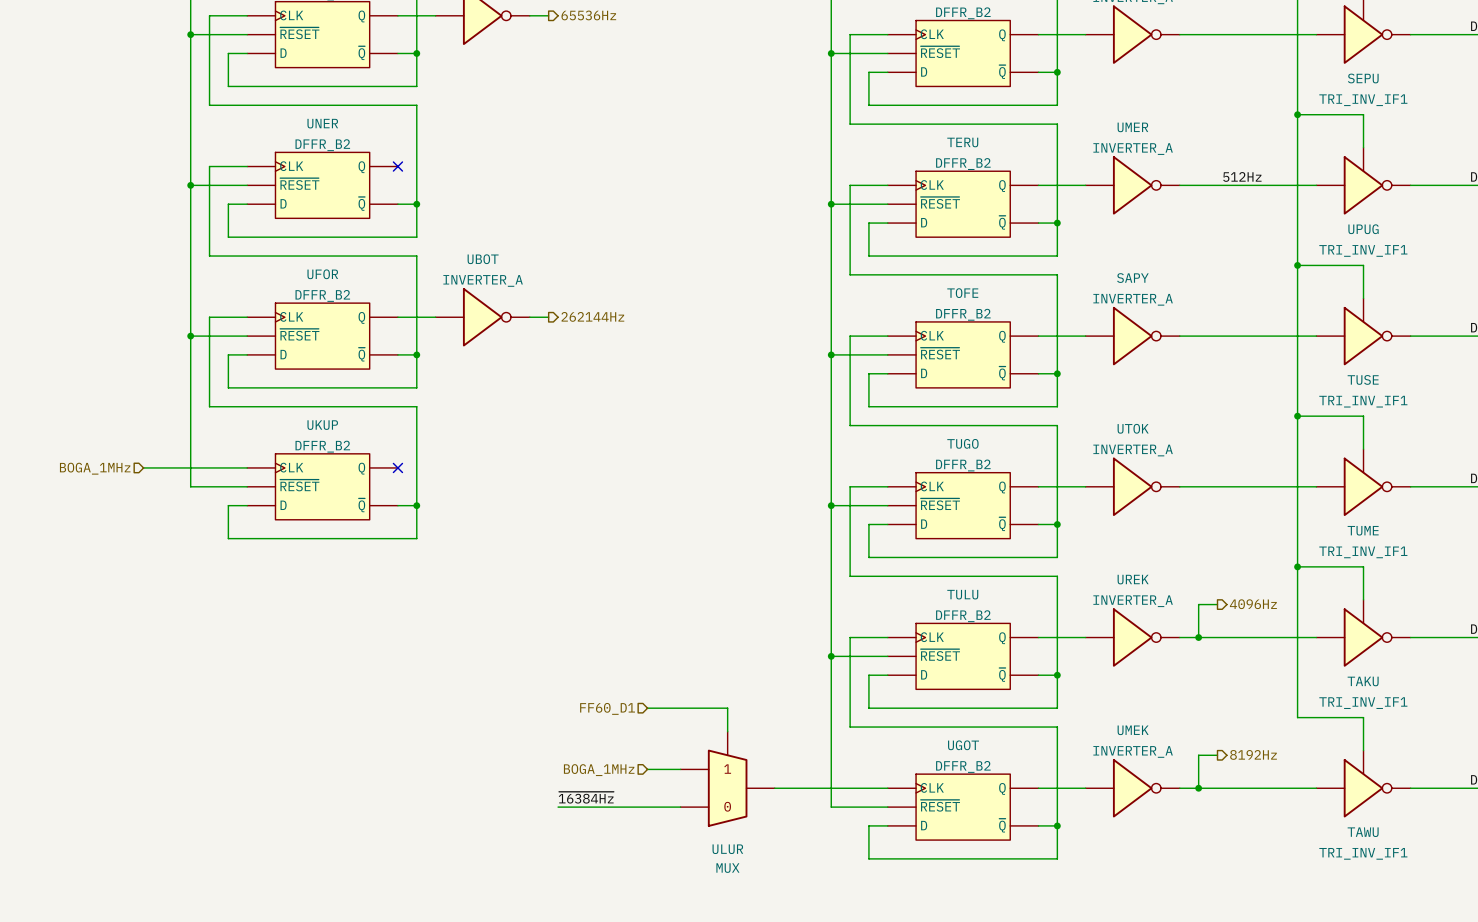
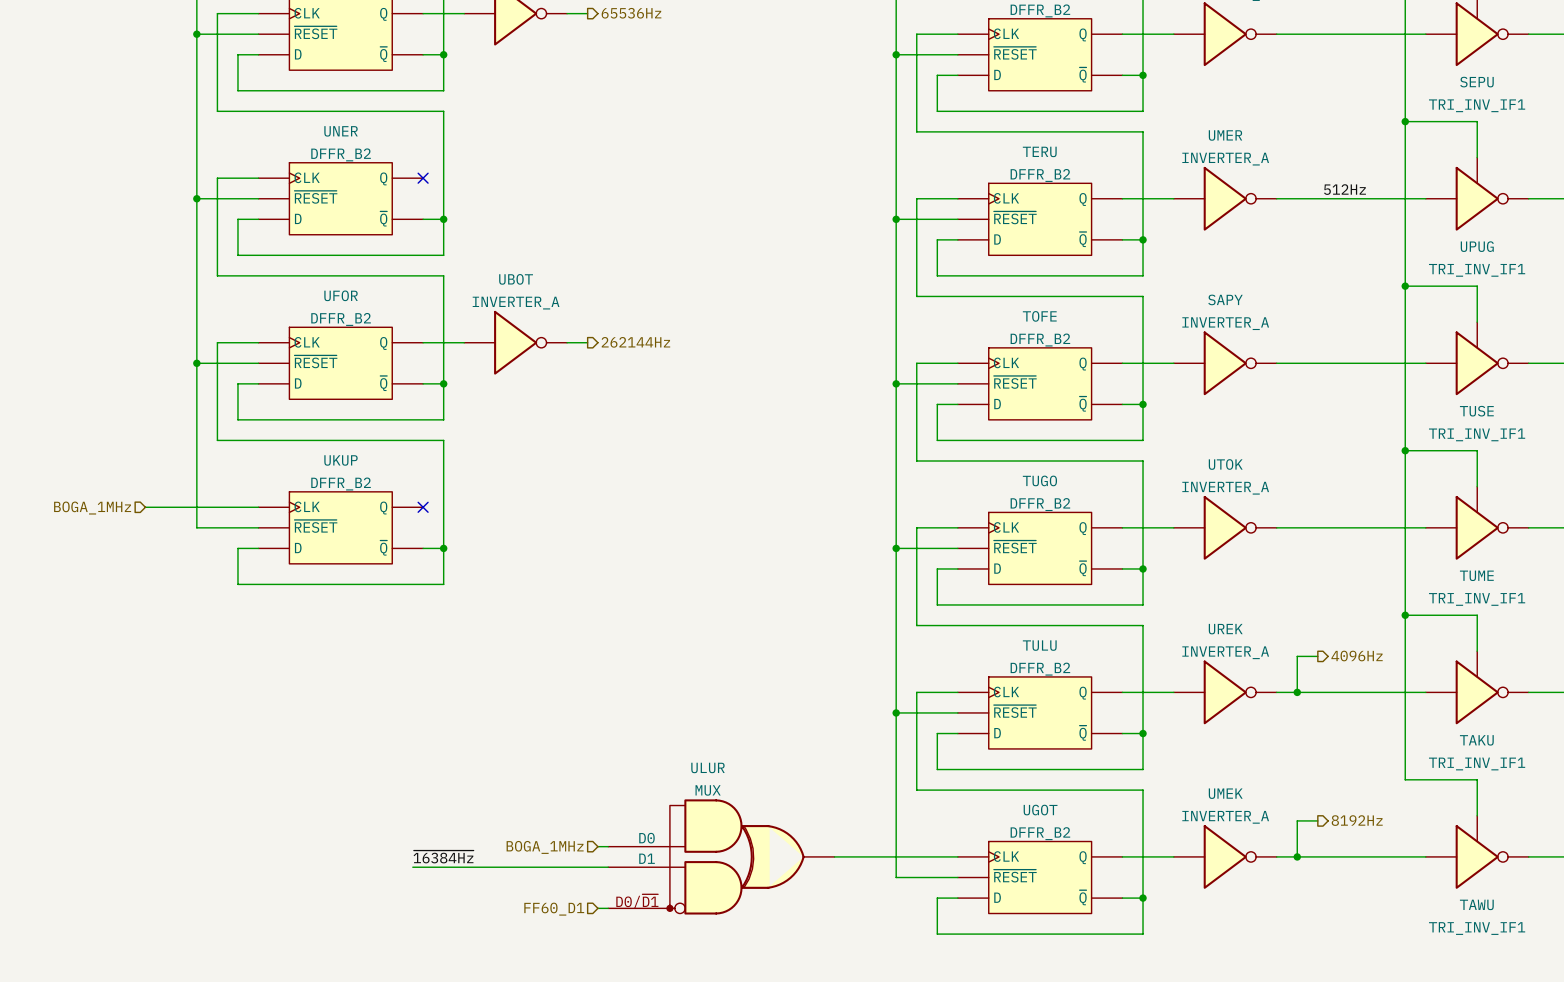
hierarchical label position: FF60_D1 (607, 708) -> FF60_D1 (554, 909)
wire: (647, 708) (727, 708) (727, 731) -> none
hierarchical label position: BOGA_1MHz (599, 770) -> BOGA_1MHz (545, 847)
wire: none -> (597, 846) (608, 846)
ULUR: MUX (727, 779) -> none
ULUR: none -> MUX (721, 856)
wire: none -> (412, 867) (608, 867)
label position: ~{16384Hz} (586, 797) -> ~{16384Hz} (443, 856)
wire: (558, 807) (680, 807) -> none
wire: none -> (597, 908) (608, 908)

